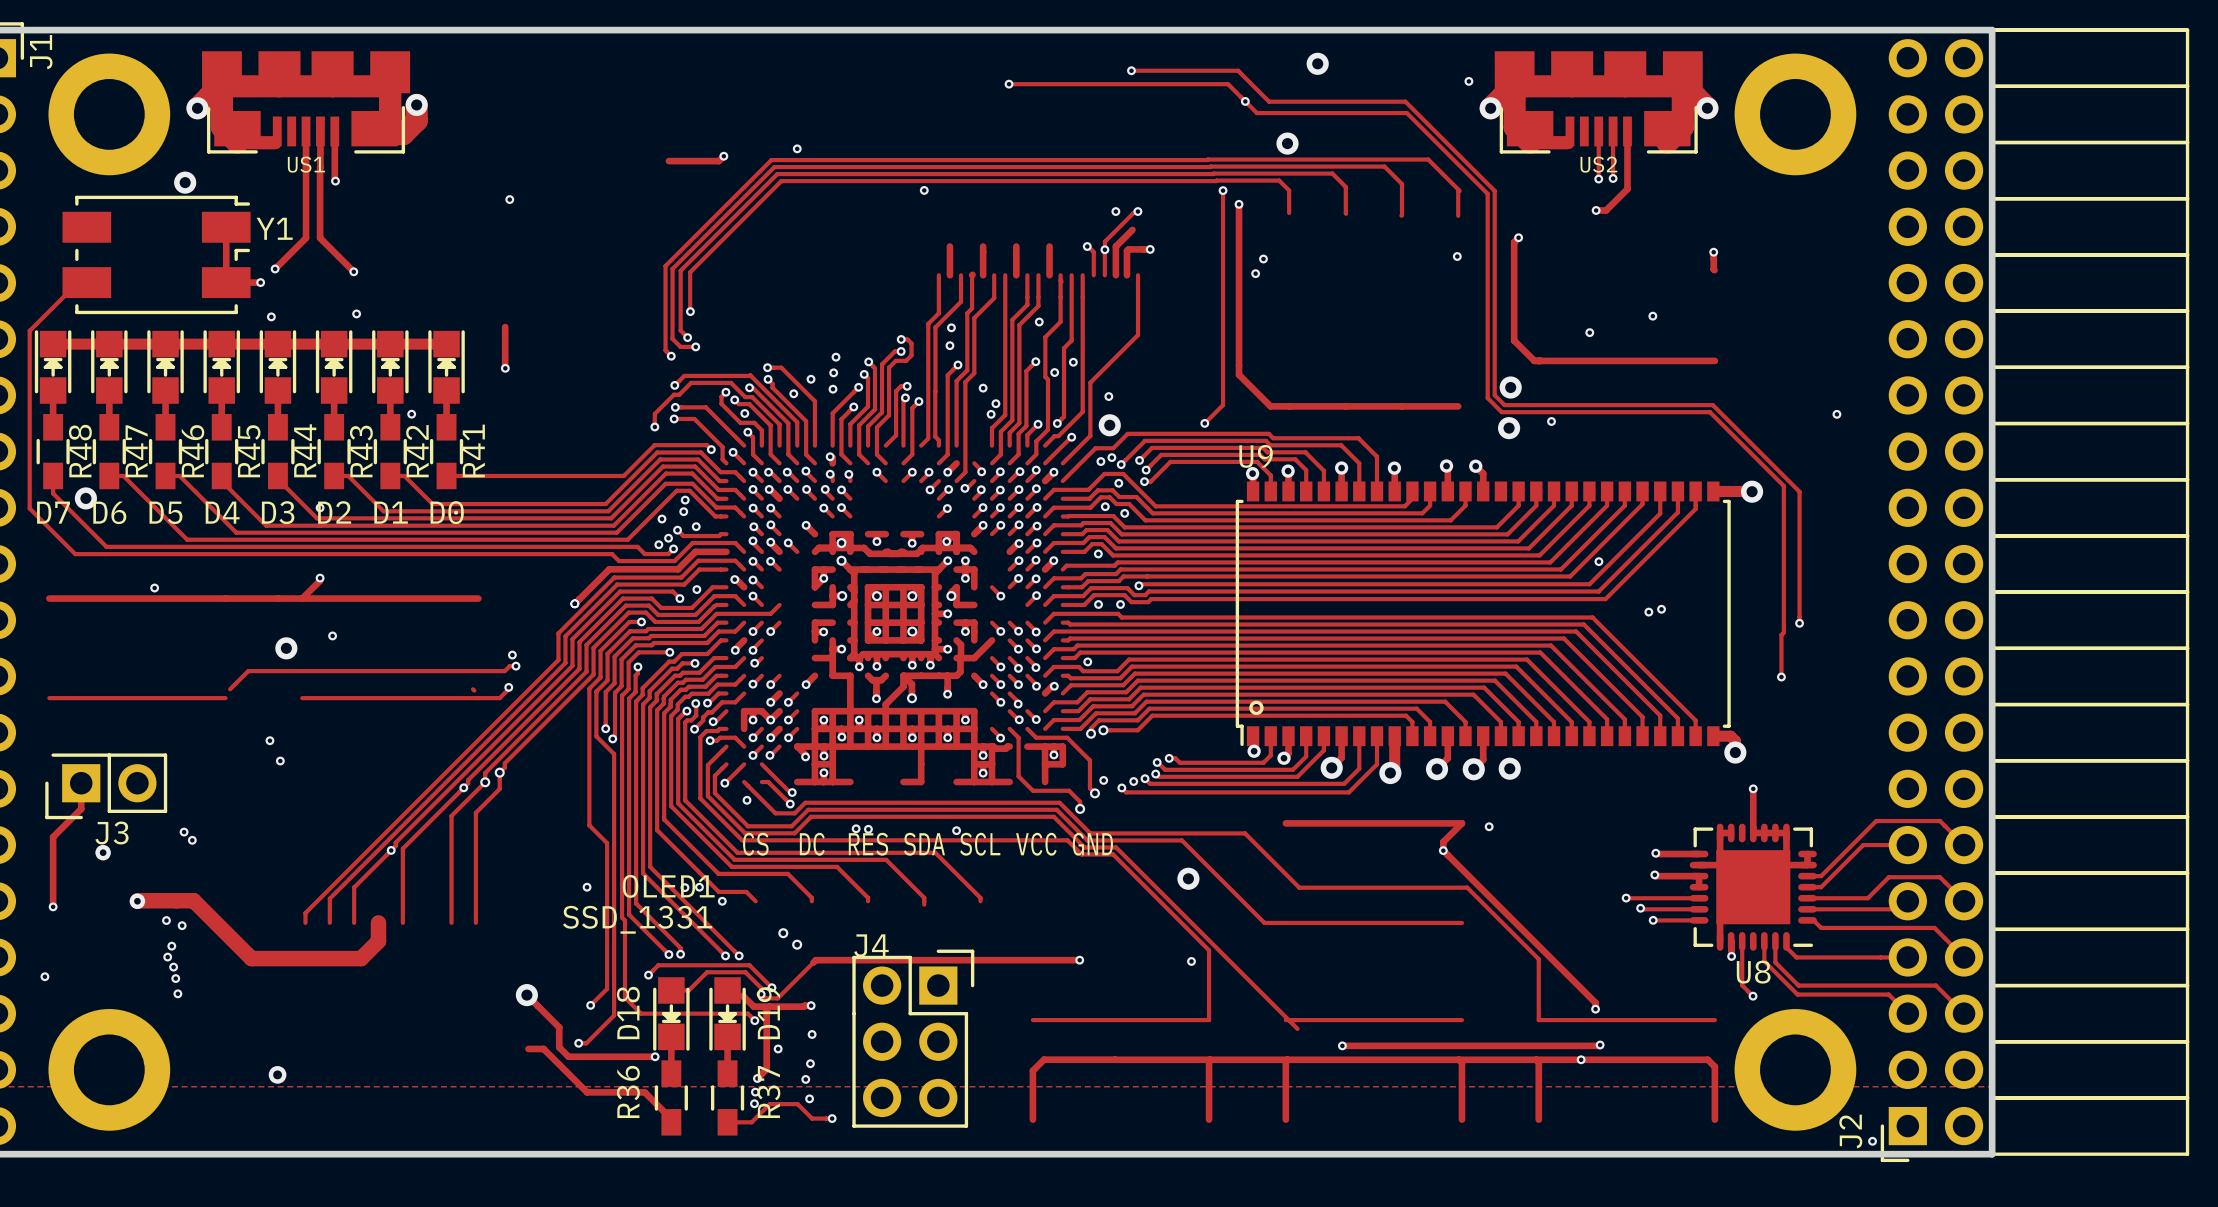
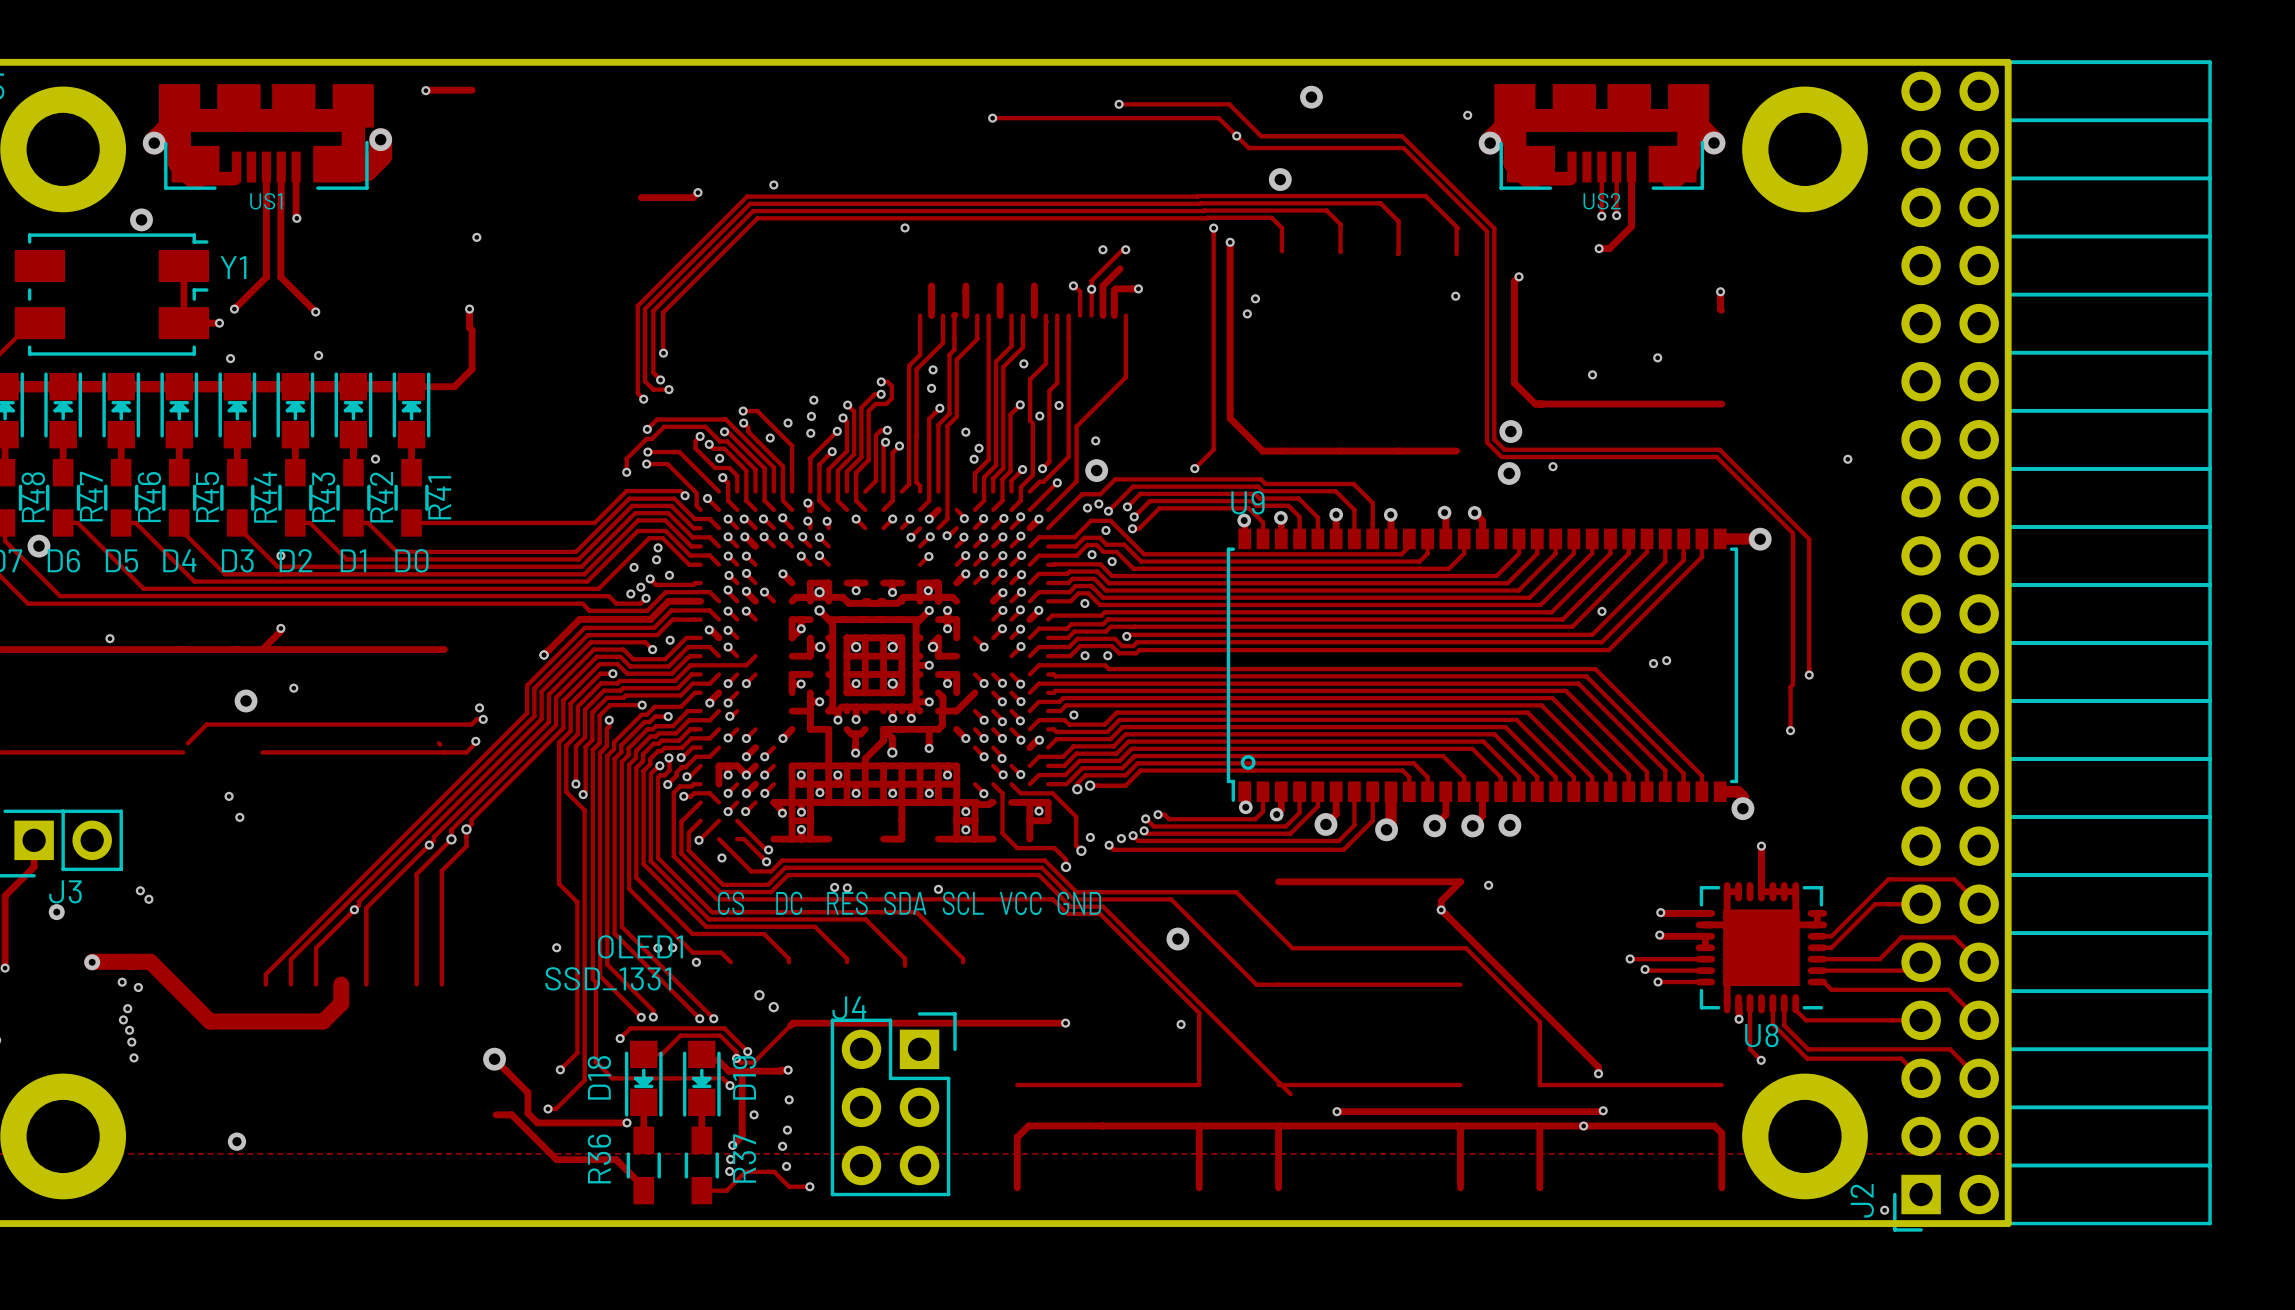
via: none -> (425, 90)
track: none -> (472, 90) (425, 90)
track: none -> (469, 309) (469, 327) (472, 330) (472, 369) (454, 386) (411, 386)
track: (505, 327) (505, 368) -> none
via position: (505, 368) -> (469, 309)

